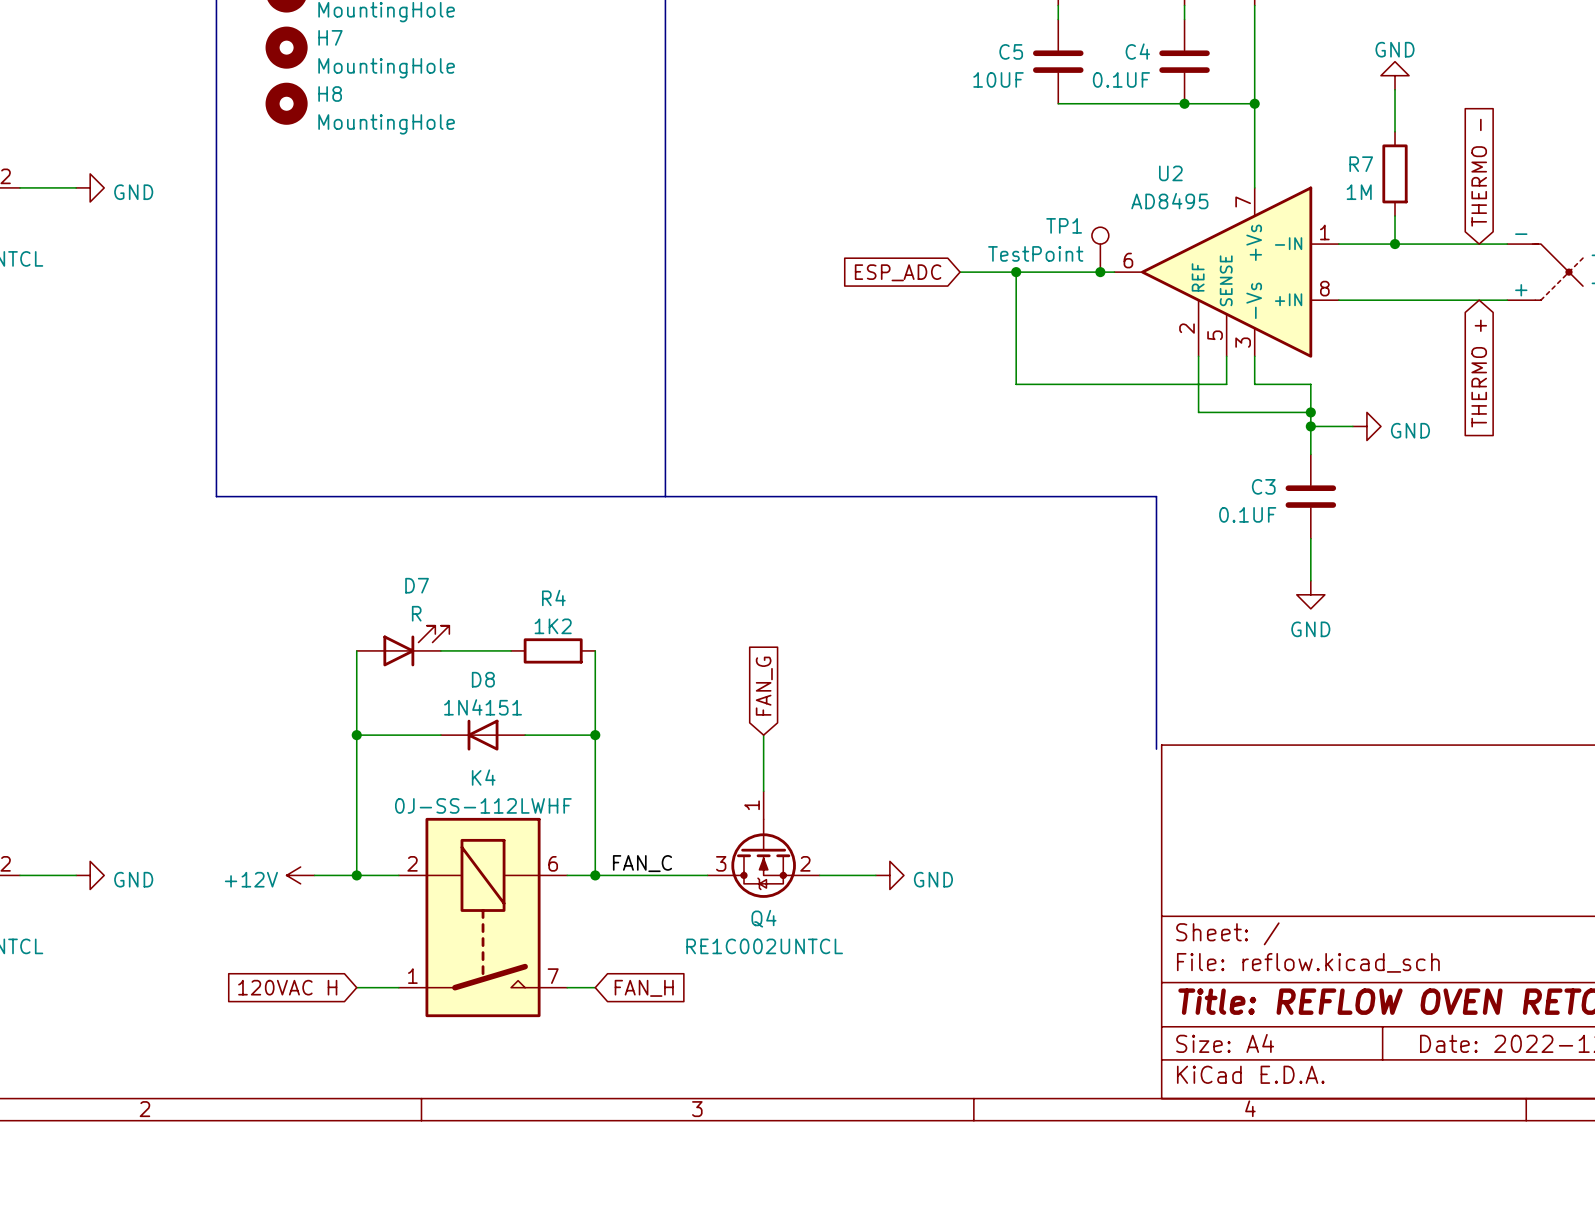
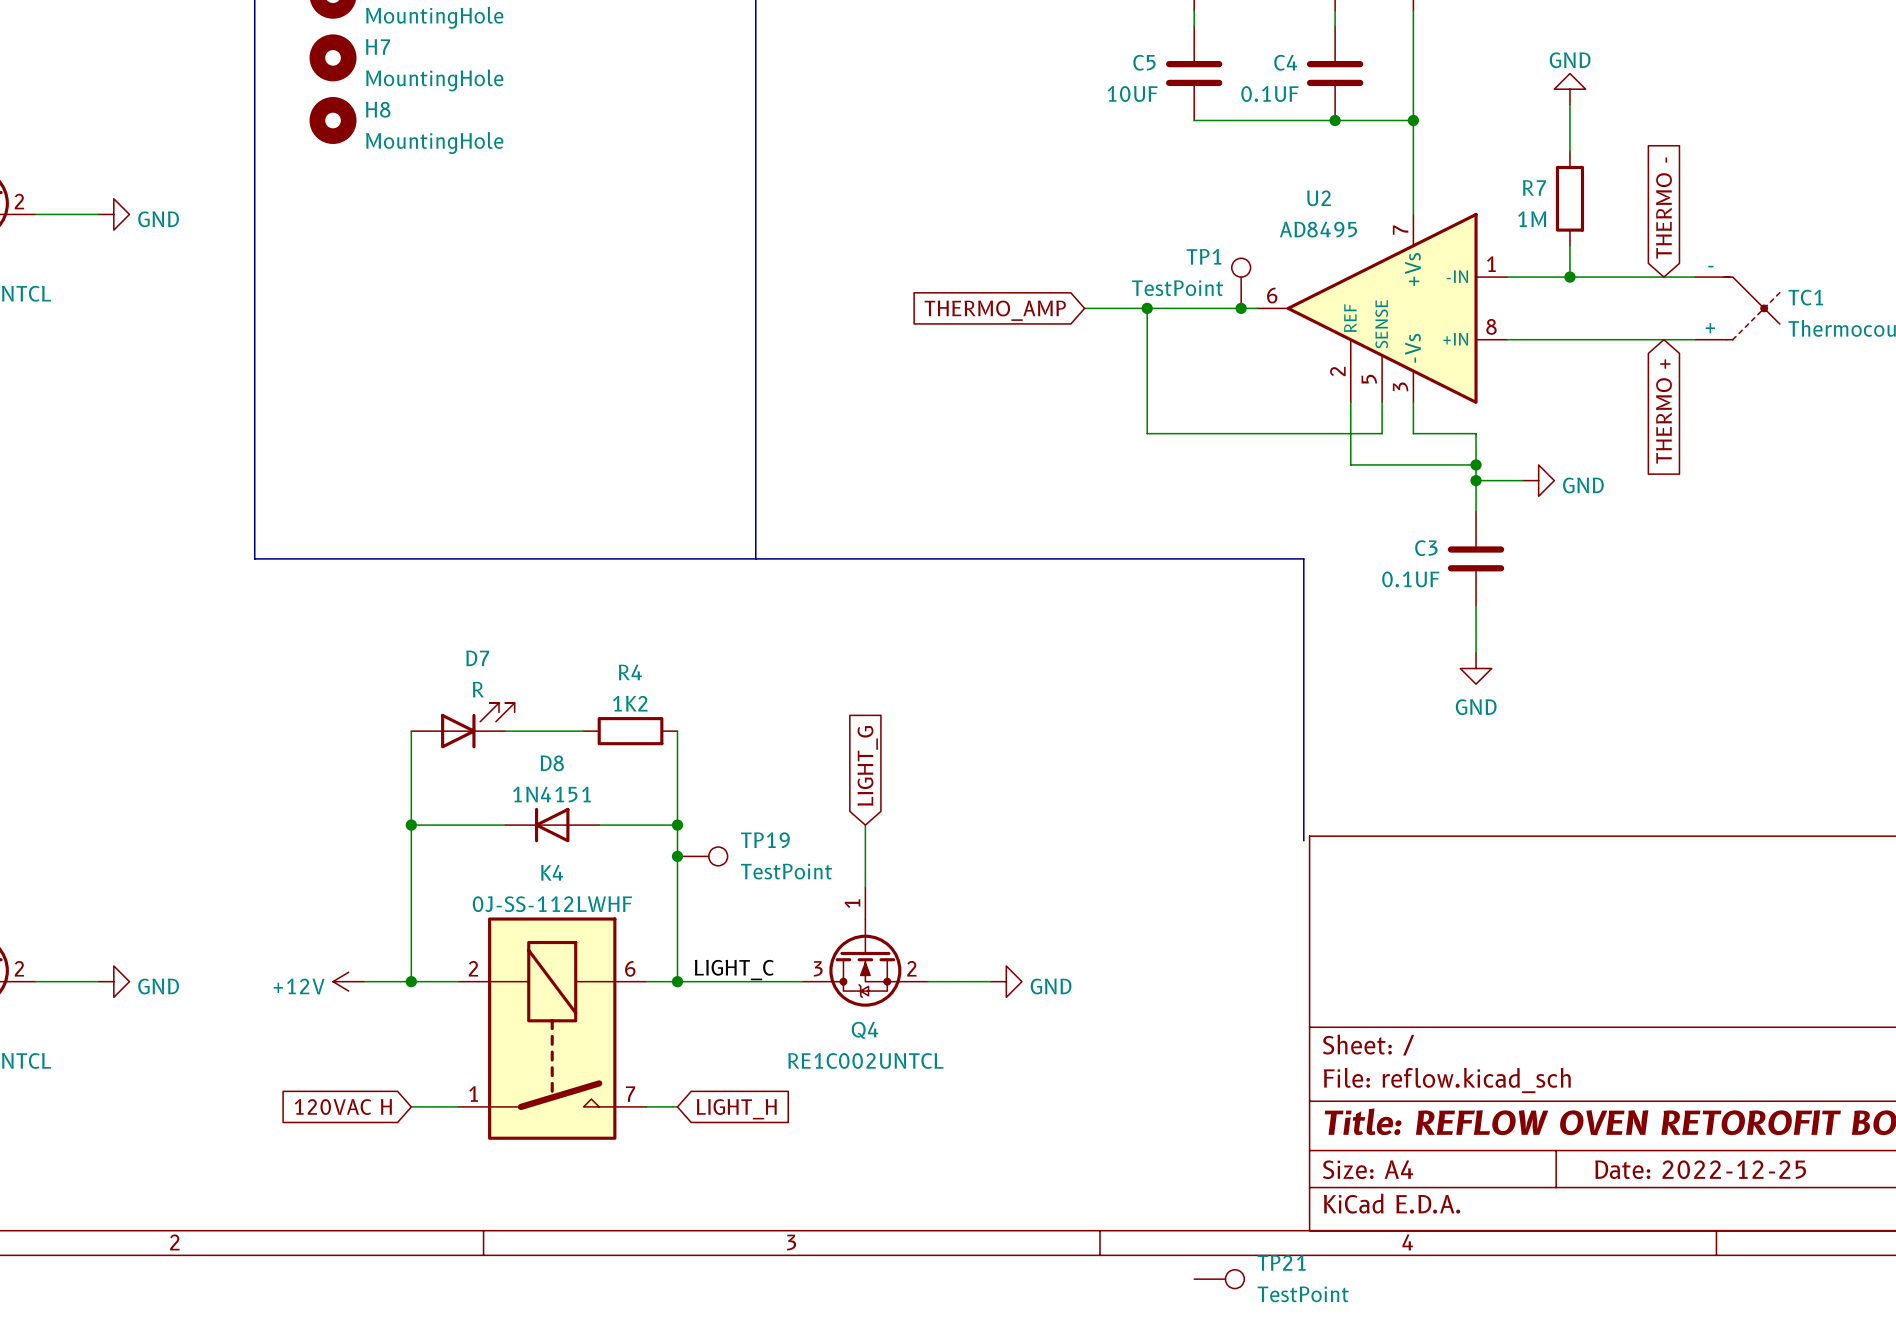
global label: ESP_ADC (898, 272) -> THERMO_AMP (995, 310)
global label: FAN_G (764, 686) -> LIGHT_G (867, 765)
junction: none -> (677, 856)
TP19: none -> TestPoint (702, 856)
label: FAN_C (642, 863) -> LIGHT_C (734, 970)
global label: FAN_H (644, 988) -> LIGHT_H (736, 1109)
TP21: none -> TestPoint (1219, 1279)

